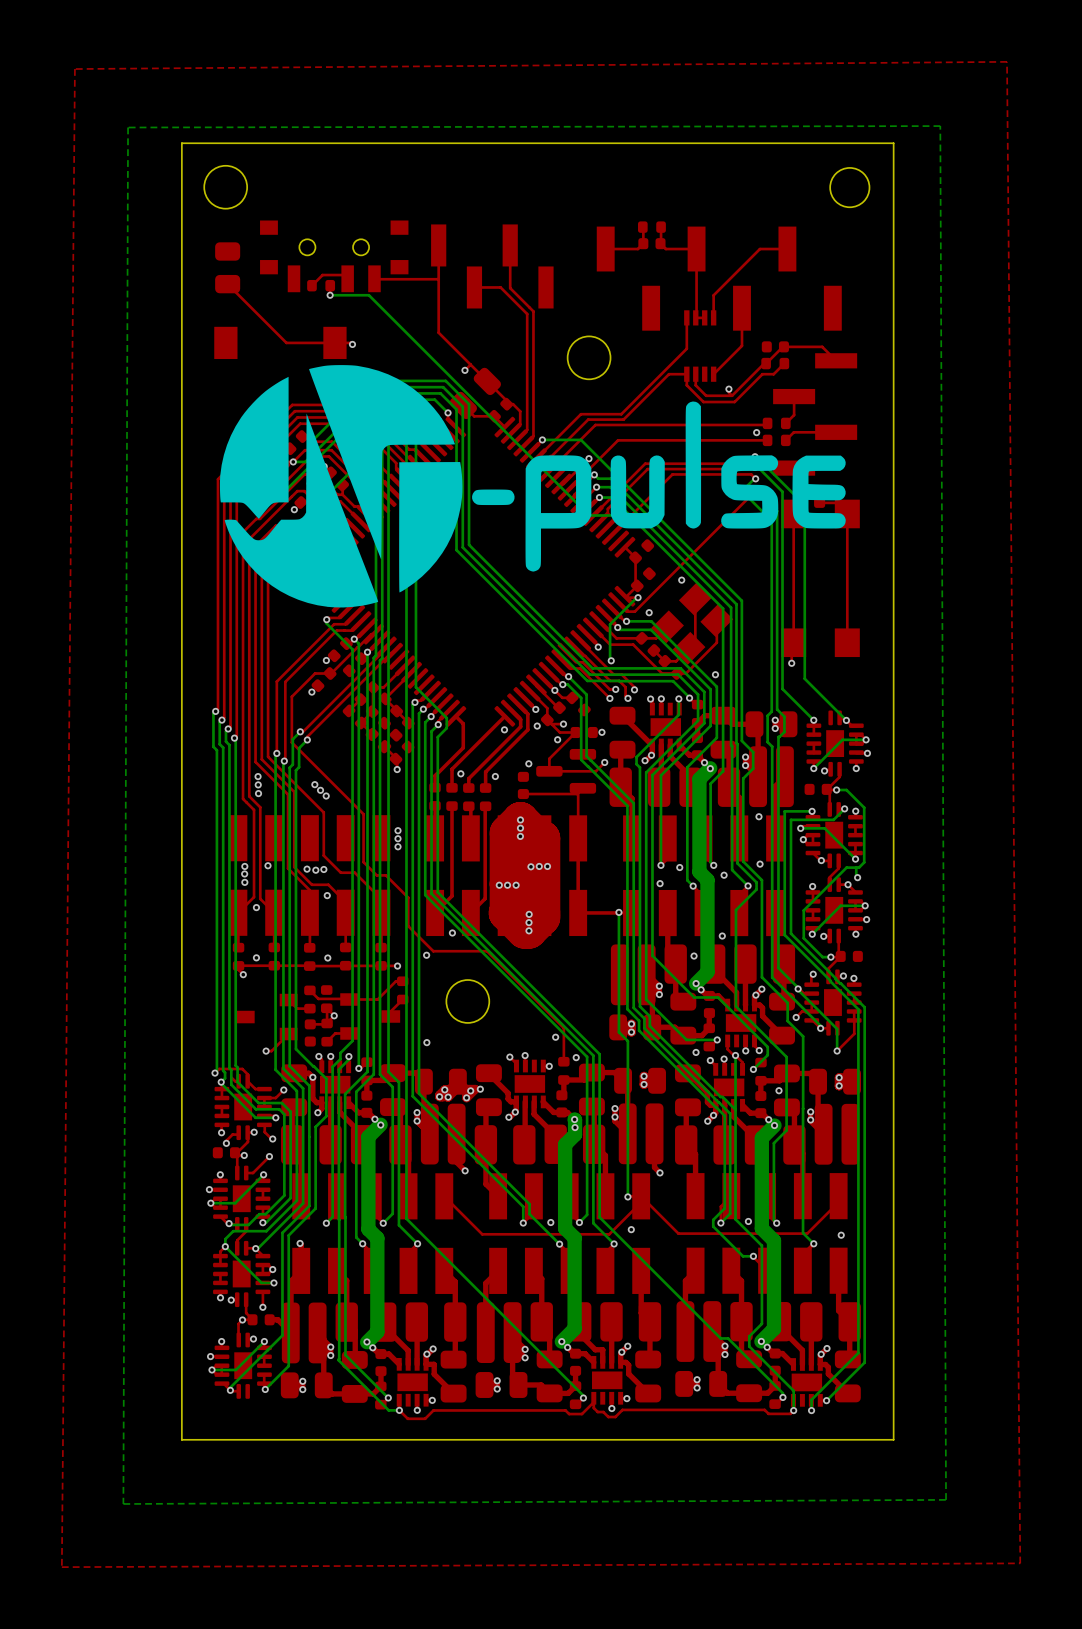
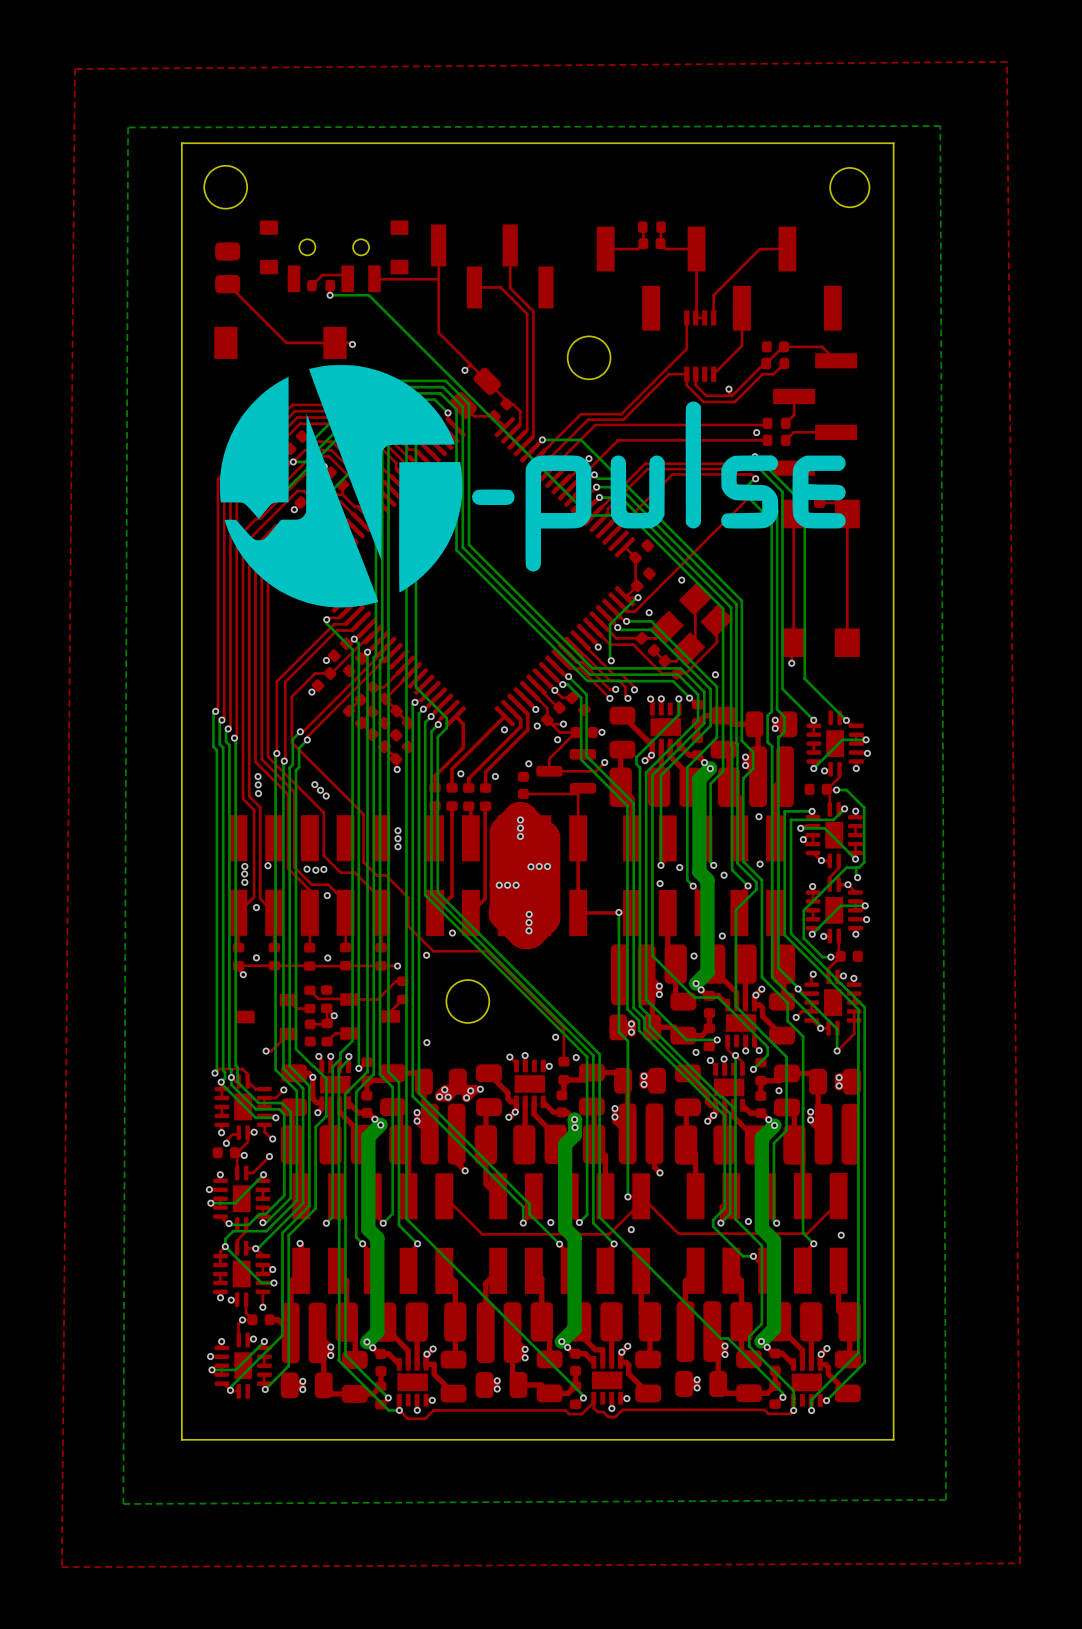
via: none -> (231, 1077)

